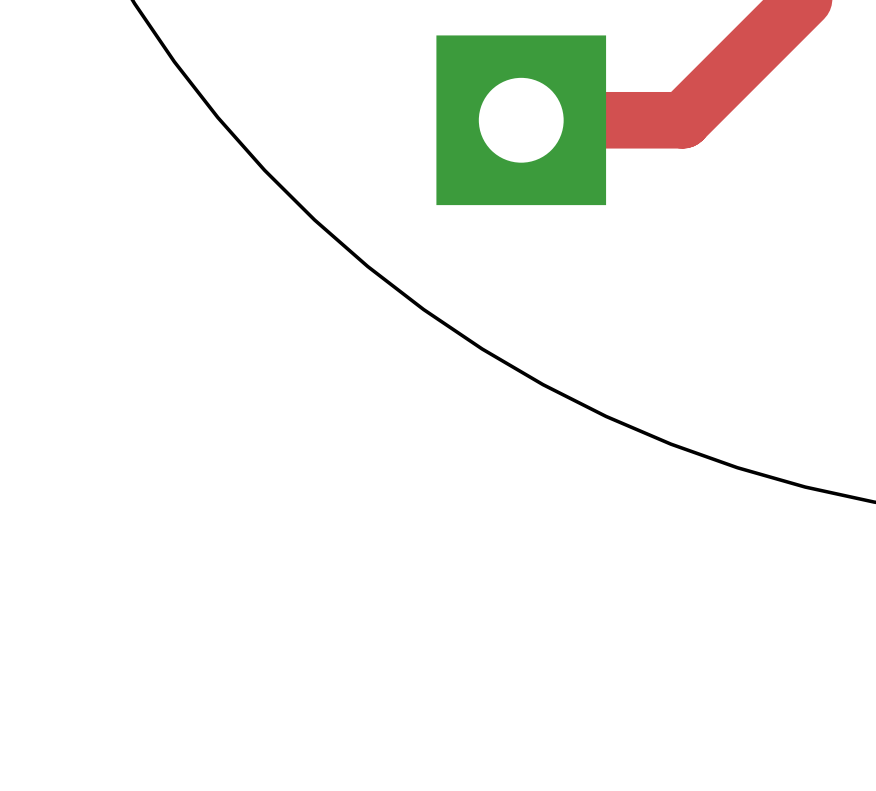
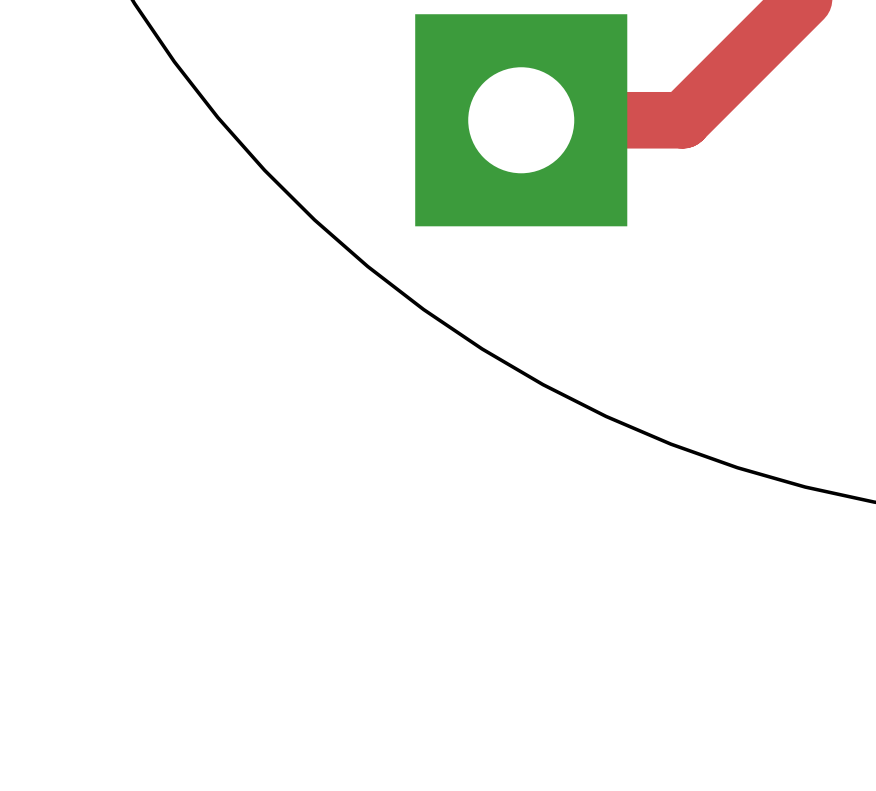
part footprint: [436, 35, 607, 206] -> [415, 14, 628, 227]

